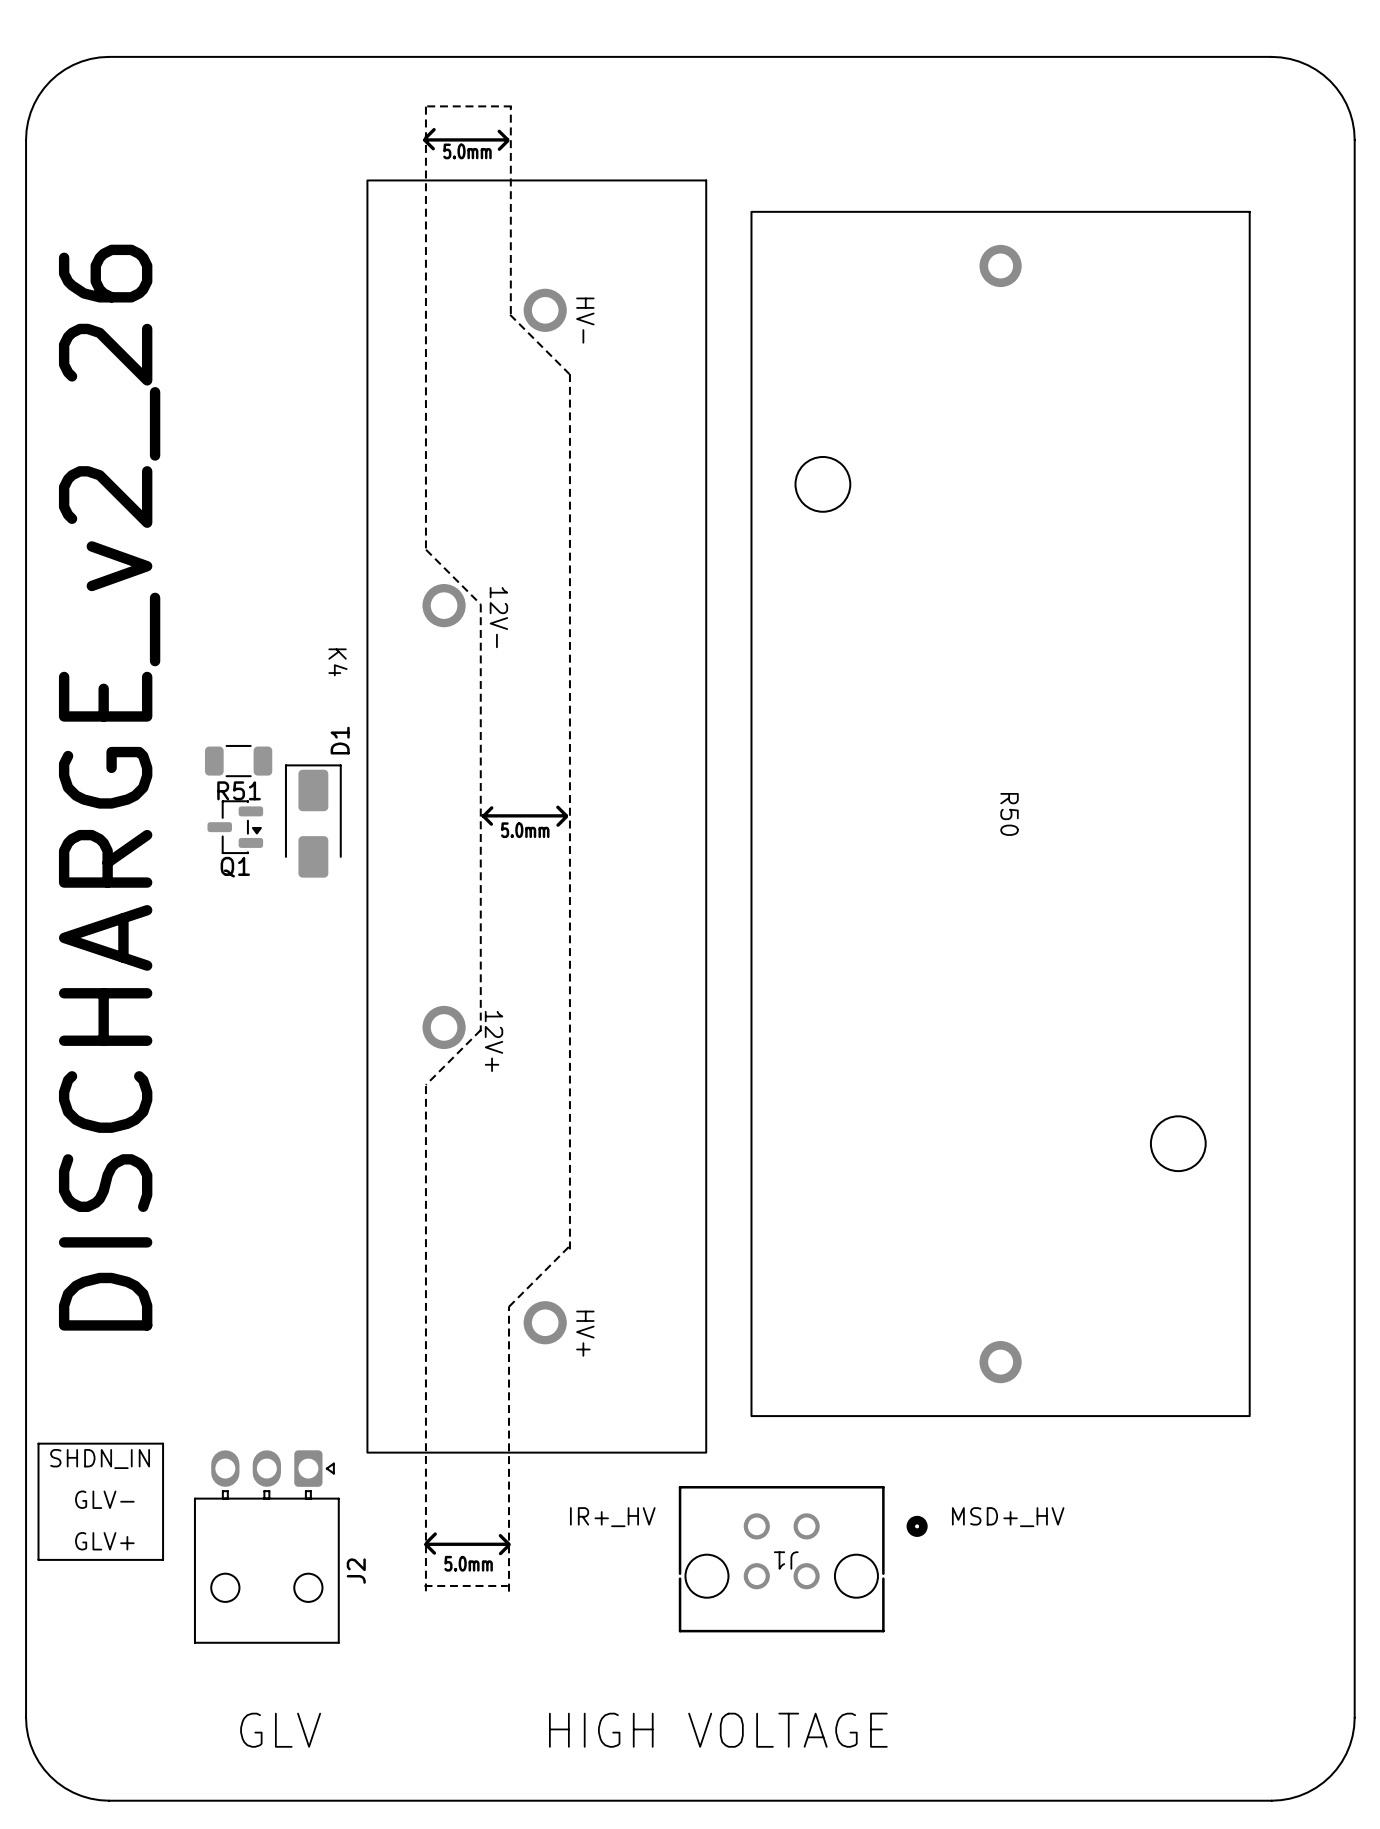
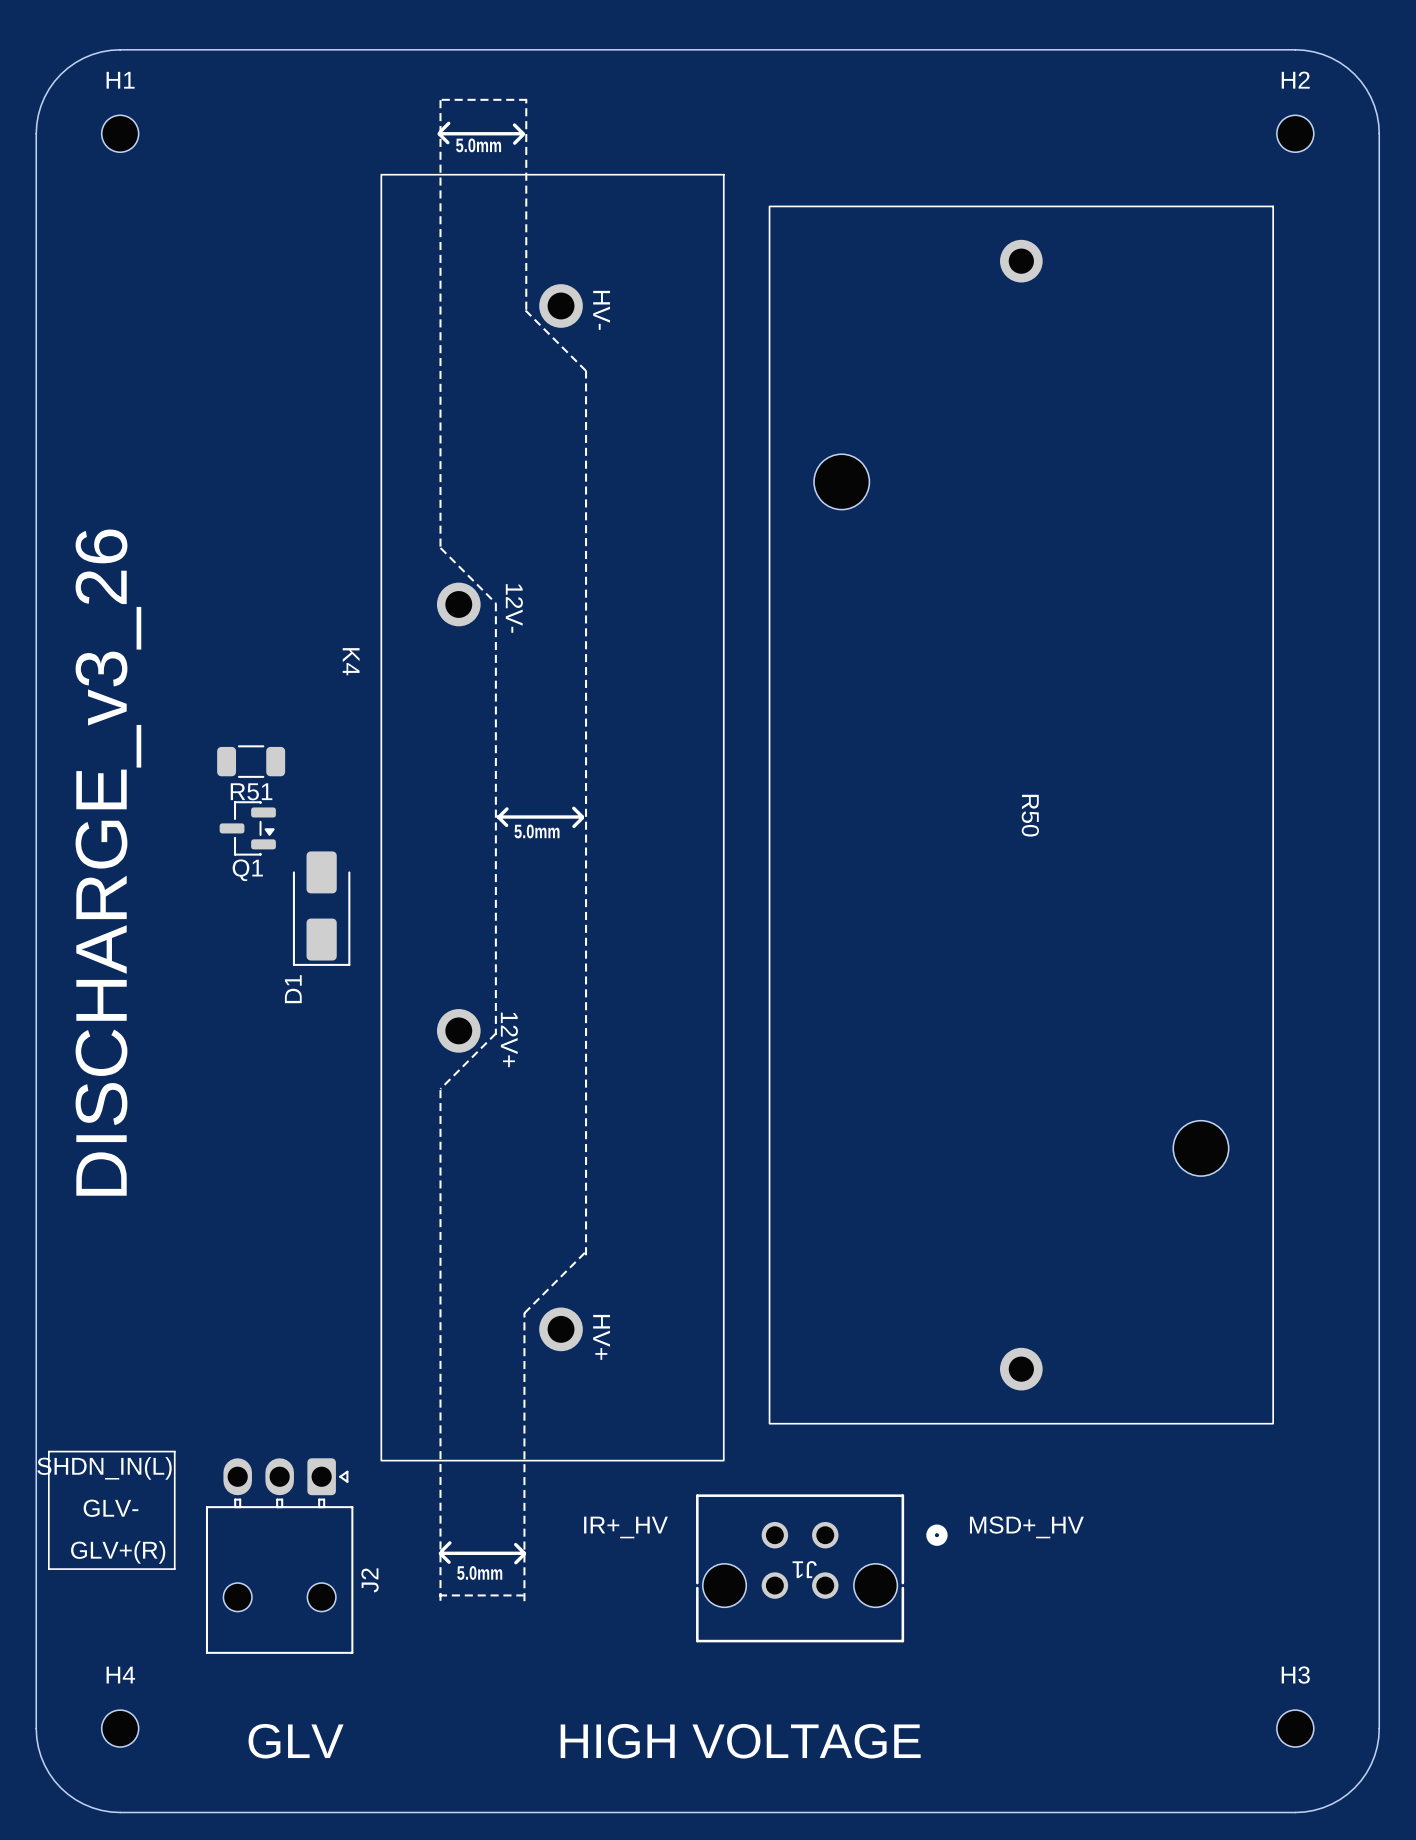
H1: none -> (120, 133)
H2: none -> (1295, 133)
text: DISCHARGE_v2_26 (109, 787) -> DISCHARGE_v3_26 (108, 862)
D1 rotation: 0° (313, 821) -> 180° (321, 908)
D1 position: (313, 821) -> (321, 908)
text: SHDN_IN (100, 1459) -> SHDN_IN(L) (104, 1468)
text: GLV+ (104, 1541) -> GLV+(R) (118, 1552)
H4: none -> (120, 1728)
H3: none -> (1295, 1728)

